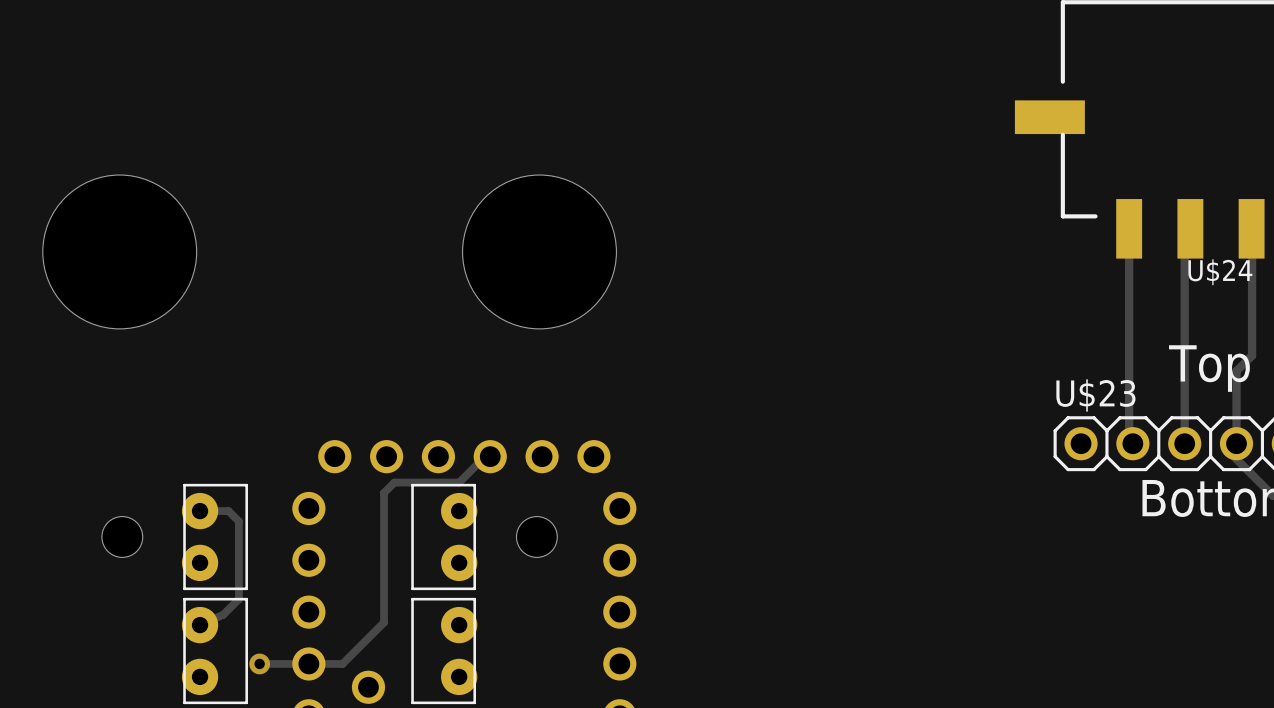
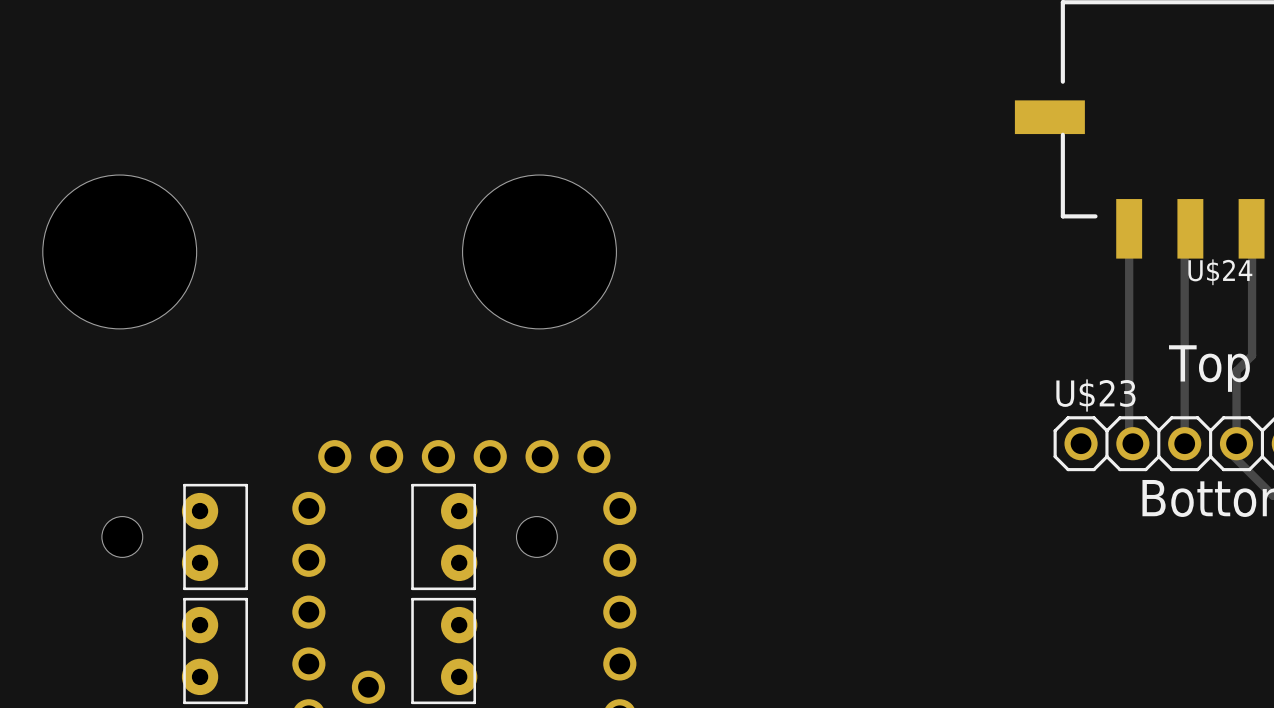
track: (490, 456) (485, 456) (459, 482) (394, 482) (384, 492) (384, 622) (342, 663) (259, 663) -> none
track: (200, 511) (228, 511) (238, 521) (238, 599) (223, 614) (200, 625) -> none
via: (259, 663) -> none

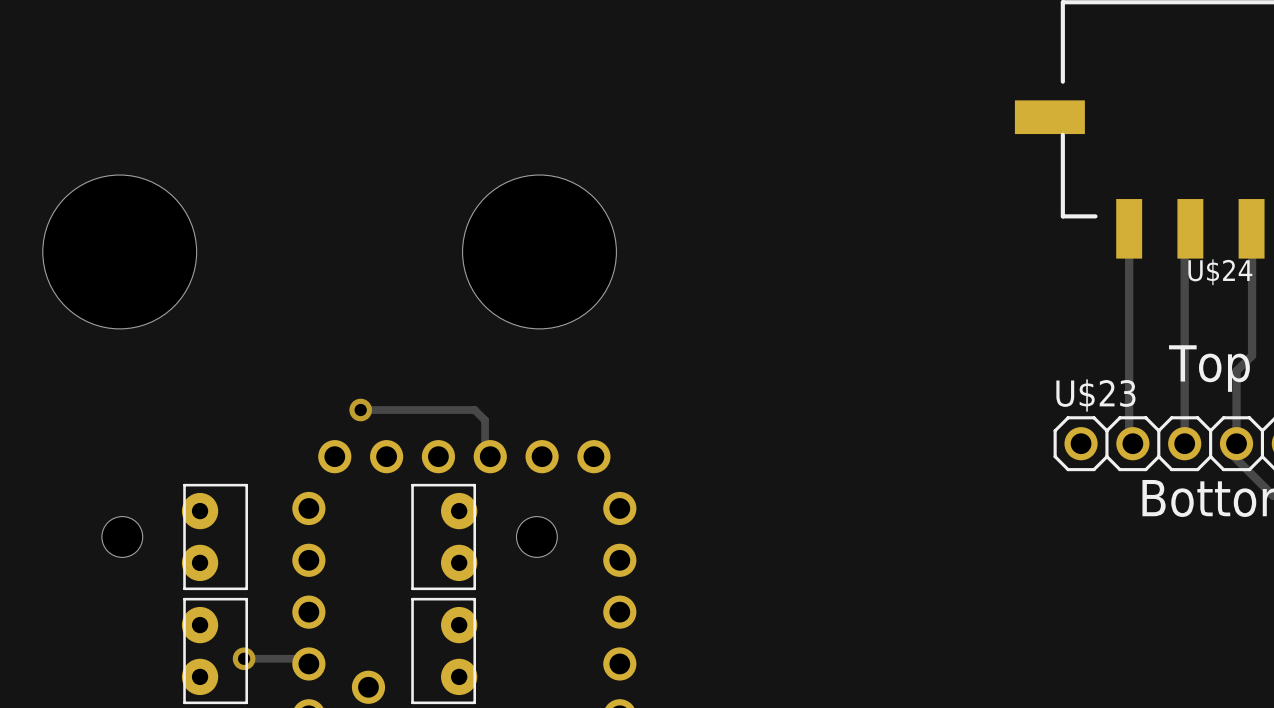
track: none -> (360, 410) (474, 410) (485, 420) (485, 451) (490, 456)
via: none -> (360, 410)
track: none -> (244, 658) (303, 658) (308, 663)
via: none -> (244, 658)

